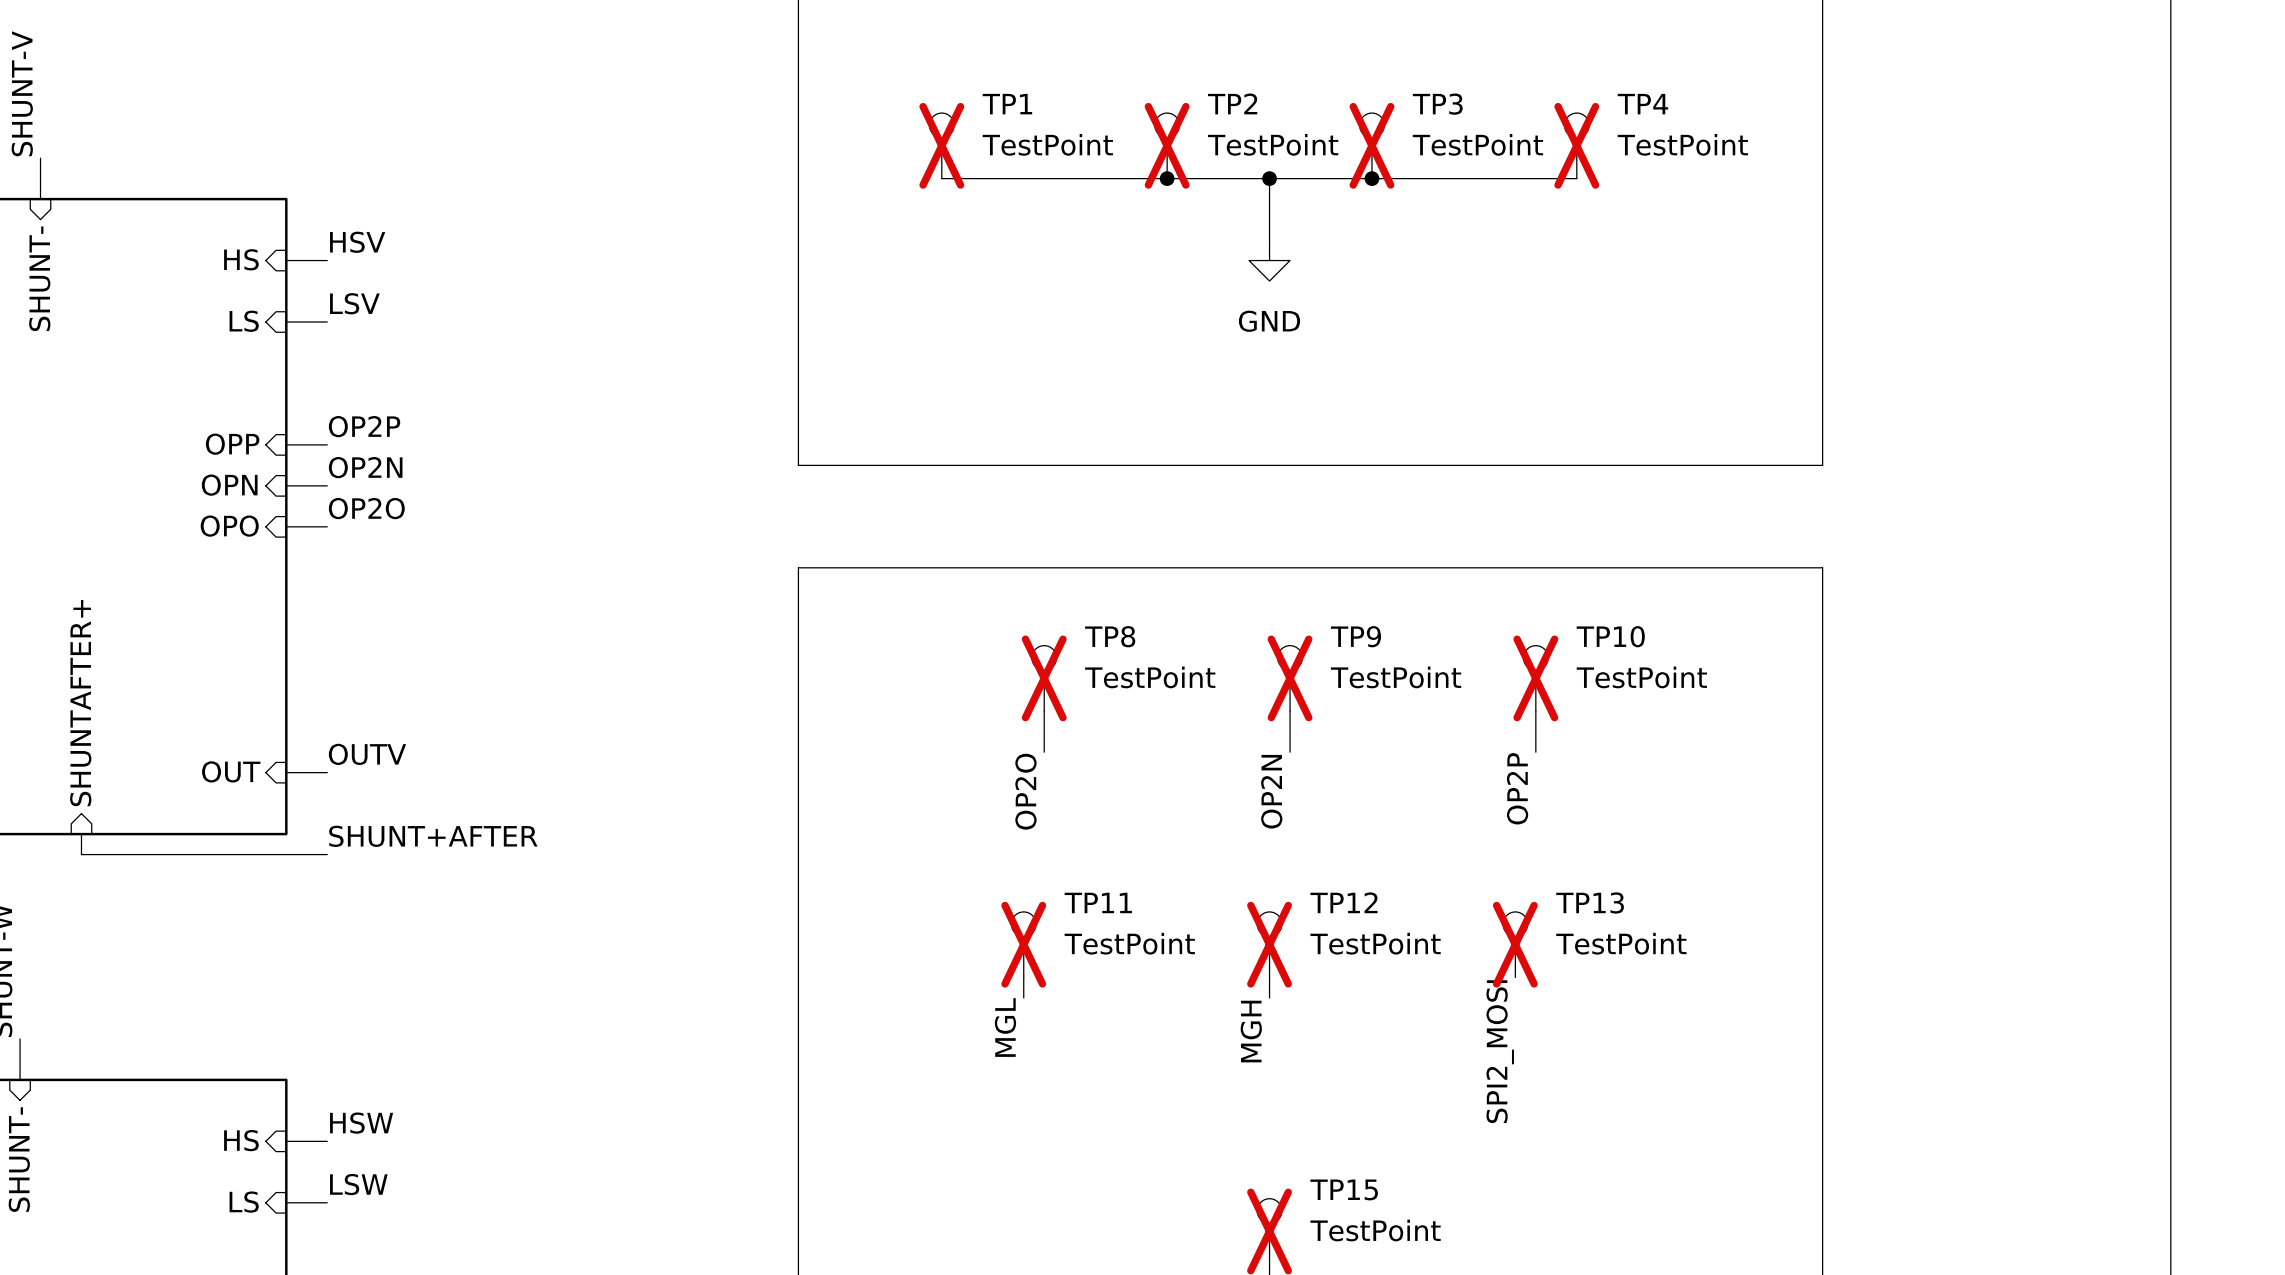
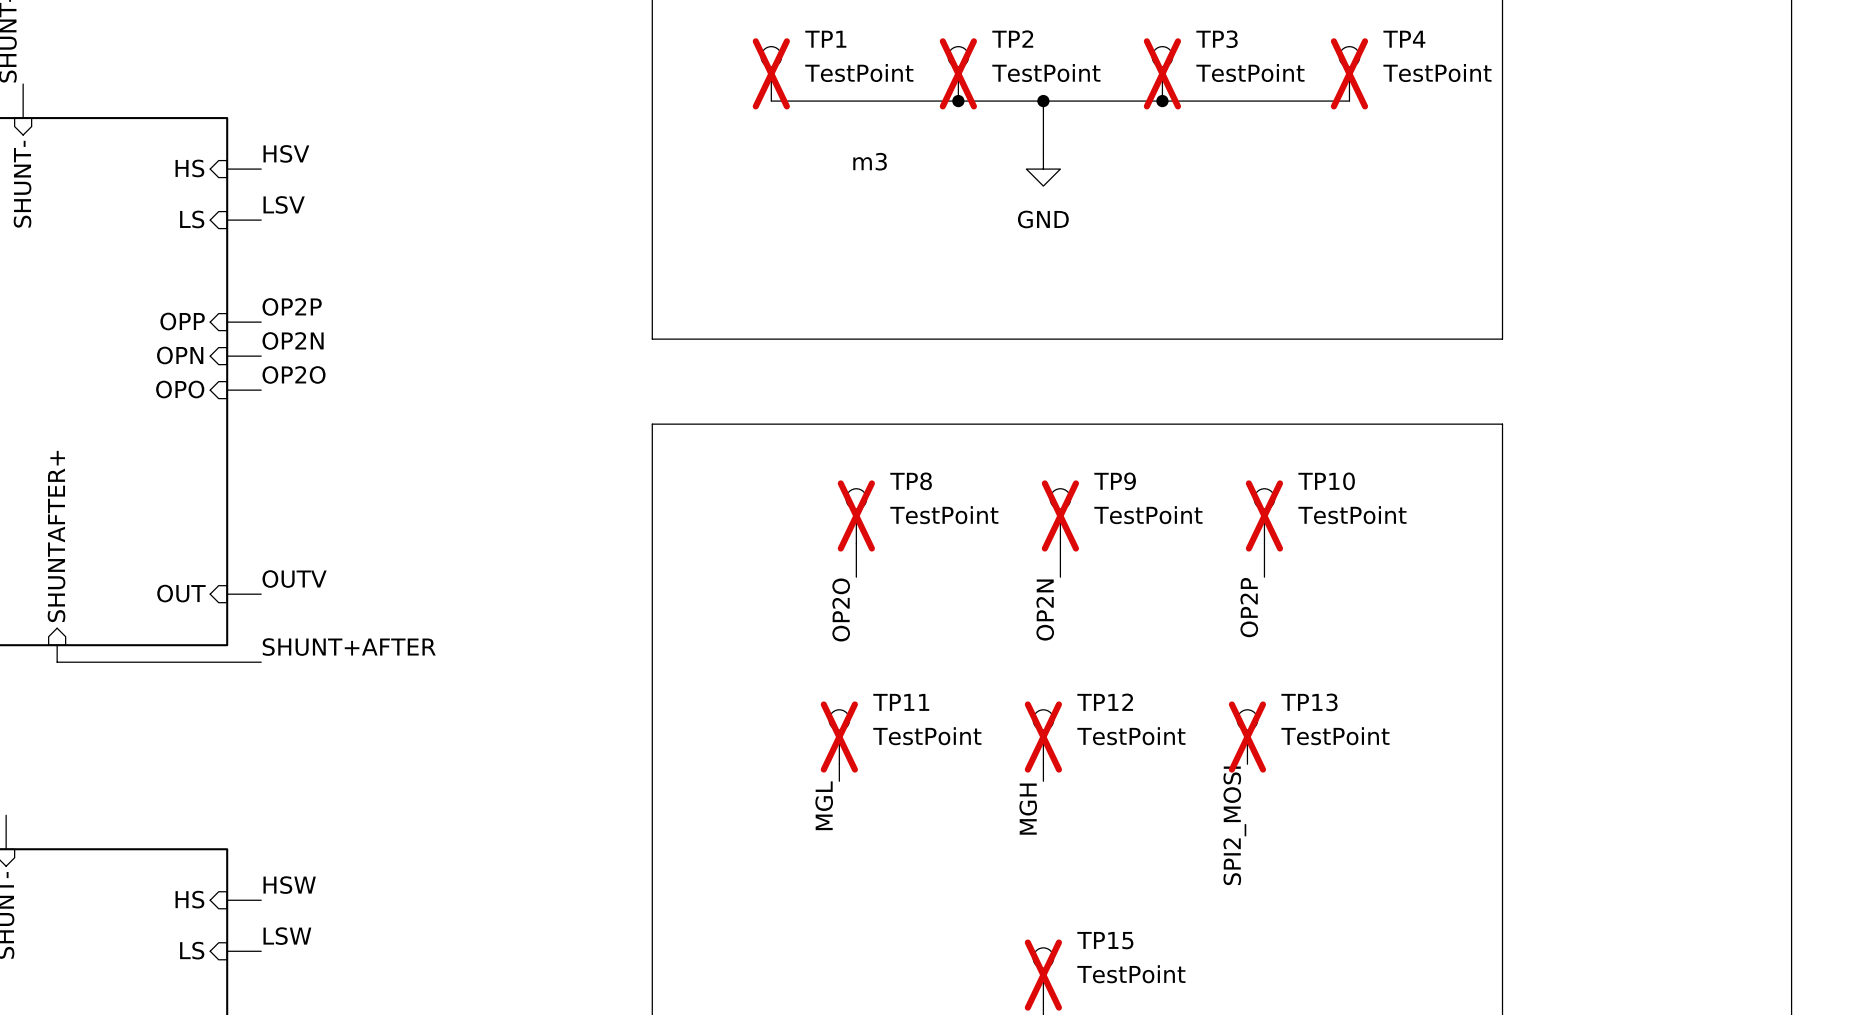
TP3 position: (1371, 145) -> (1162, 73)
TP4 position: (1576, 145) -> (1349, 73)
junction position: (1371, 178) -> (1162, 101)
wire: none -> (1298, 101) (1349, 101)
text: none -> m3 (870, 161)

